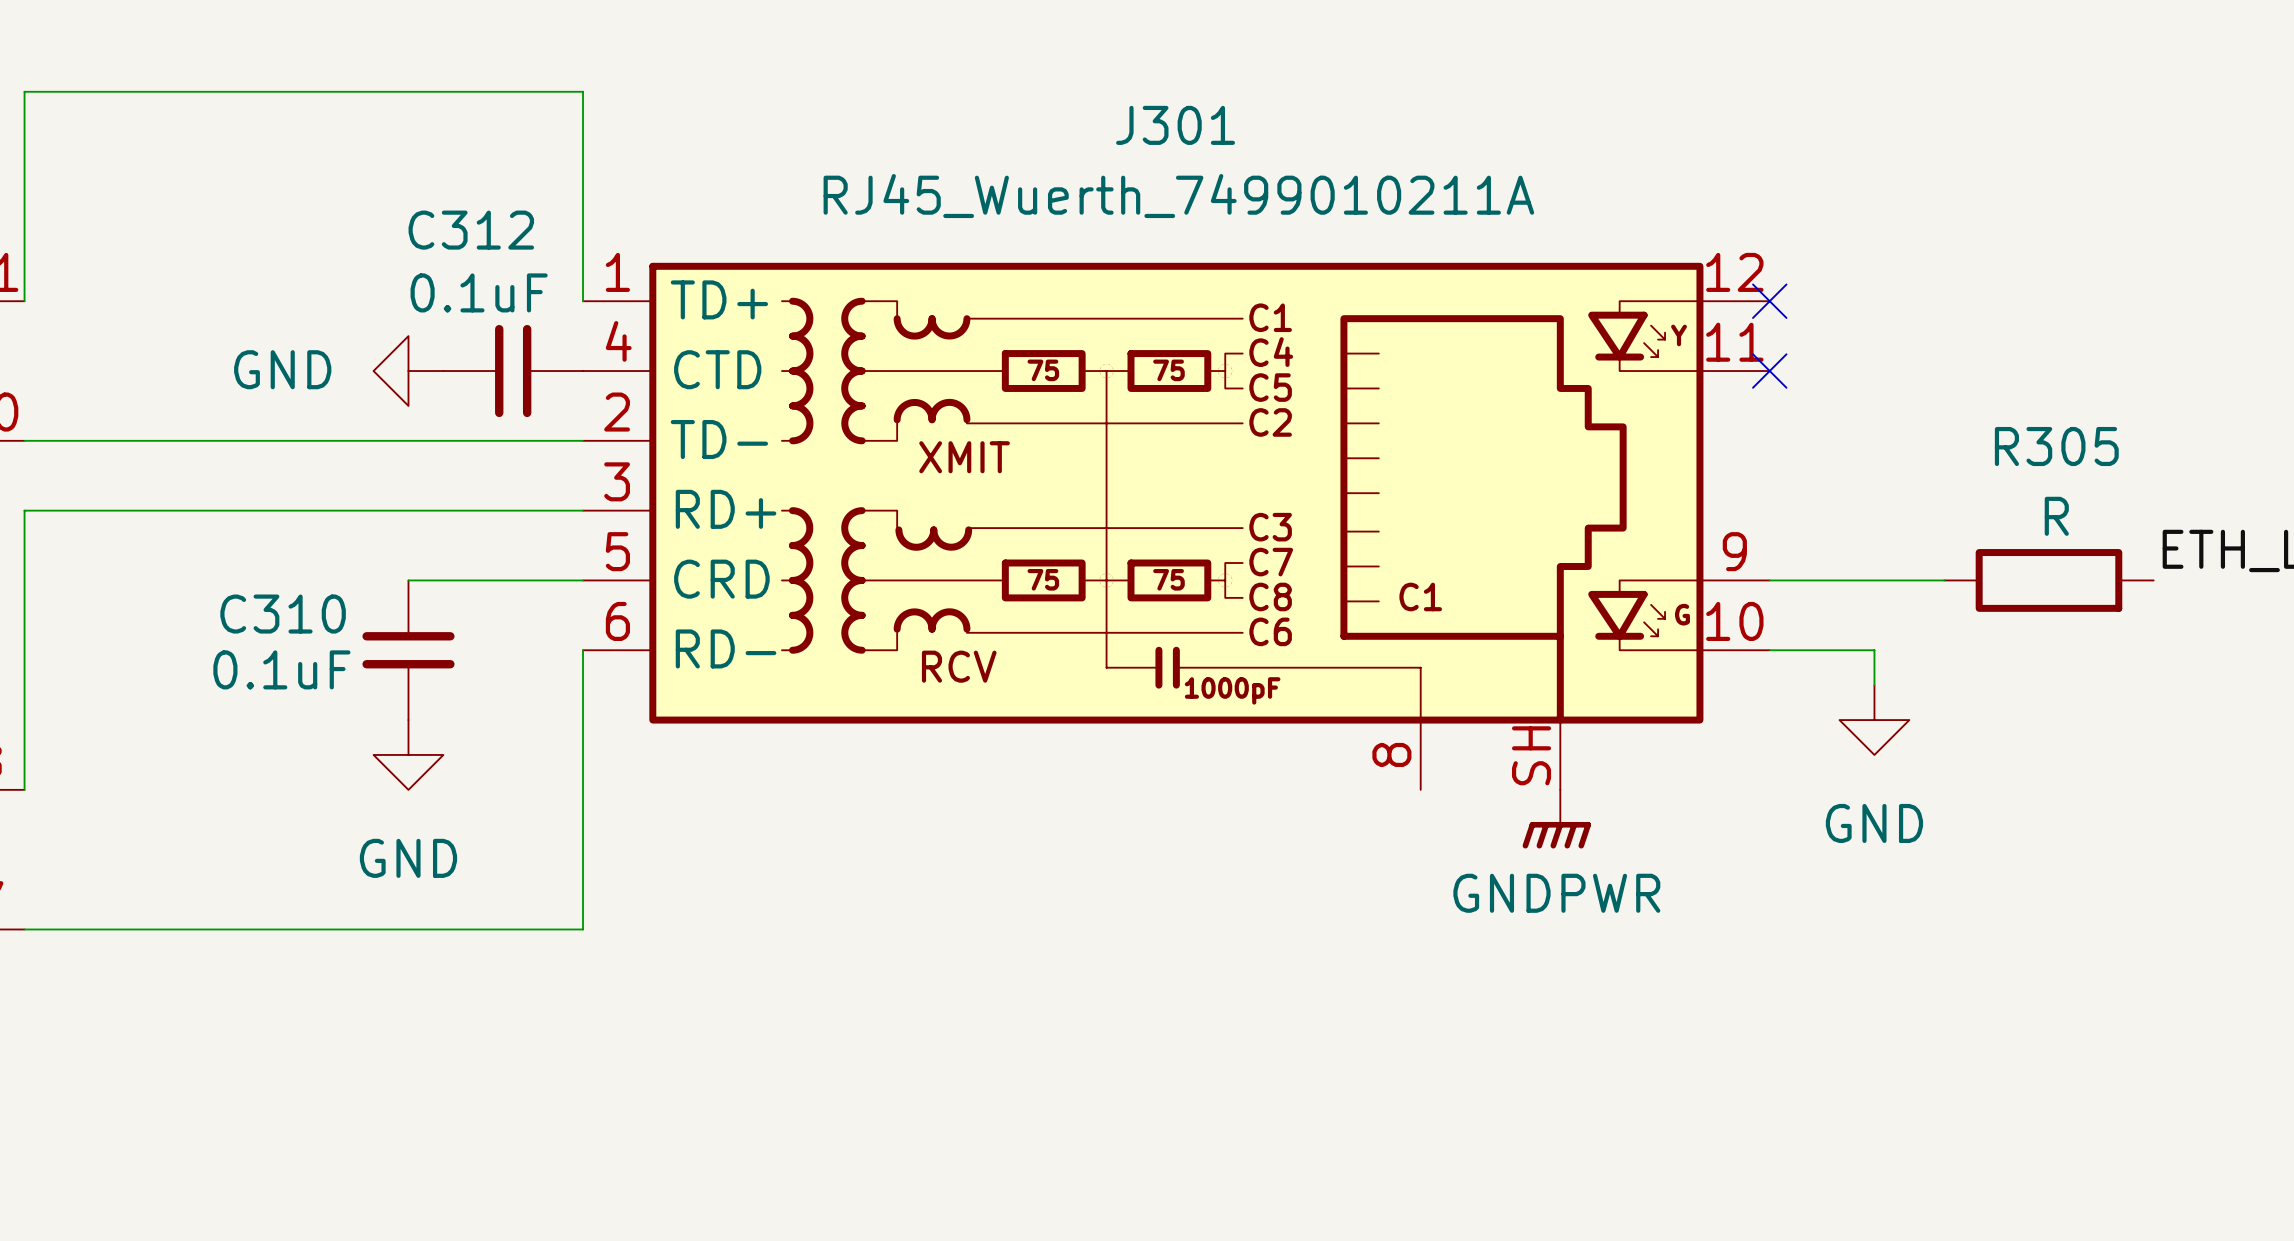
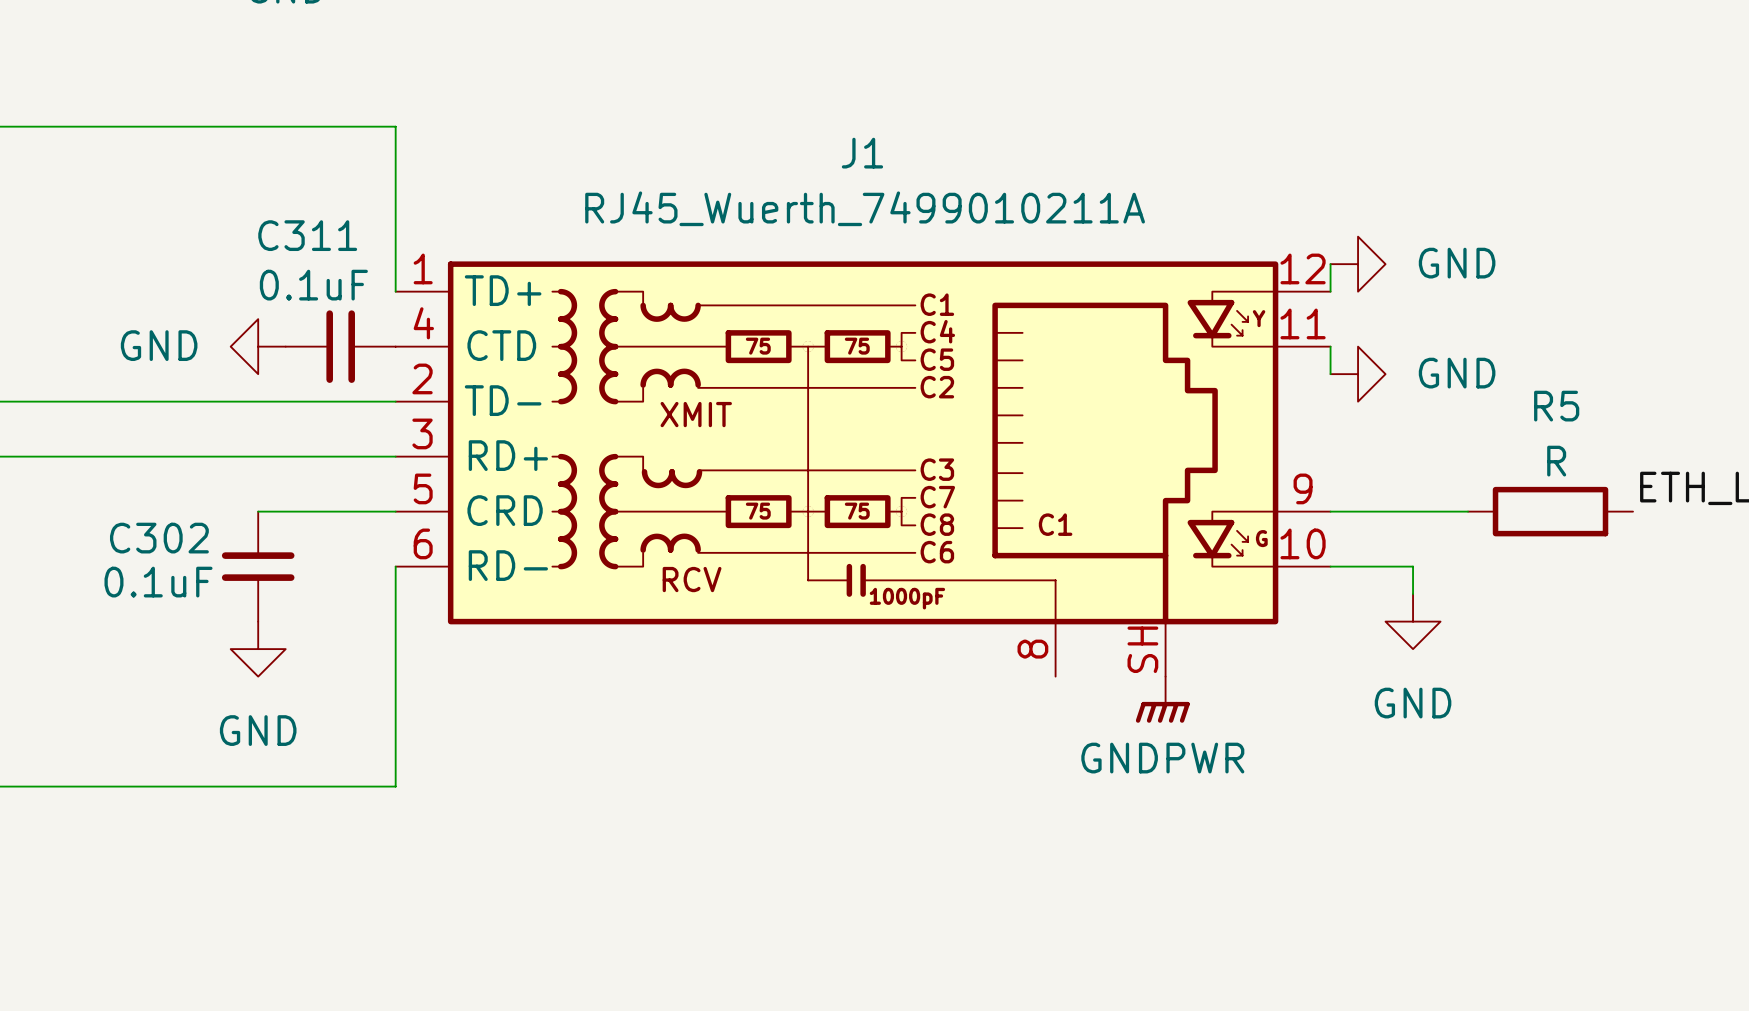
J301 name: J301 (1175, 125) -> J1 (862, 153)
C312 name: C312 (471, 230) -> C311 (307, 235)
wire: none -> (1330, 264) (1330, 291)
power symbol: none -> GND (1358, 264)
no-connect mark: (1769, 301) -> none
wire: none -> (1330, 346) (1330, 374)
no-connect mark: (1769, 371) -> none
power symbol: none -> GND (1358, 374)
R305 name: R305 (2056, 446) -> R5 (1556, 406)
C310 name: C310 (283, 614) -> C302 (159, 538)

